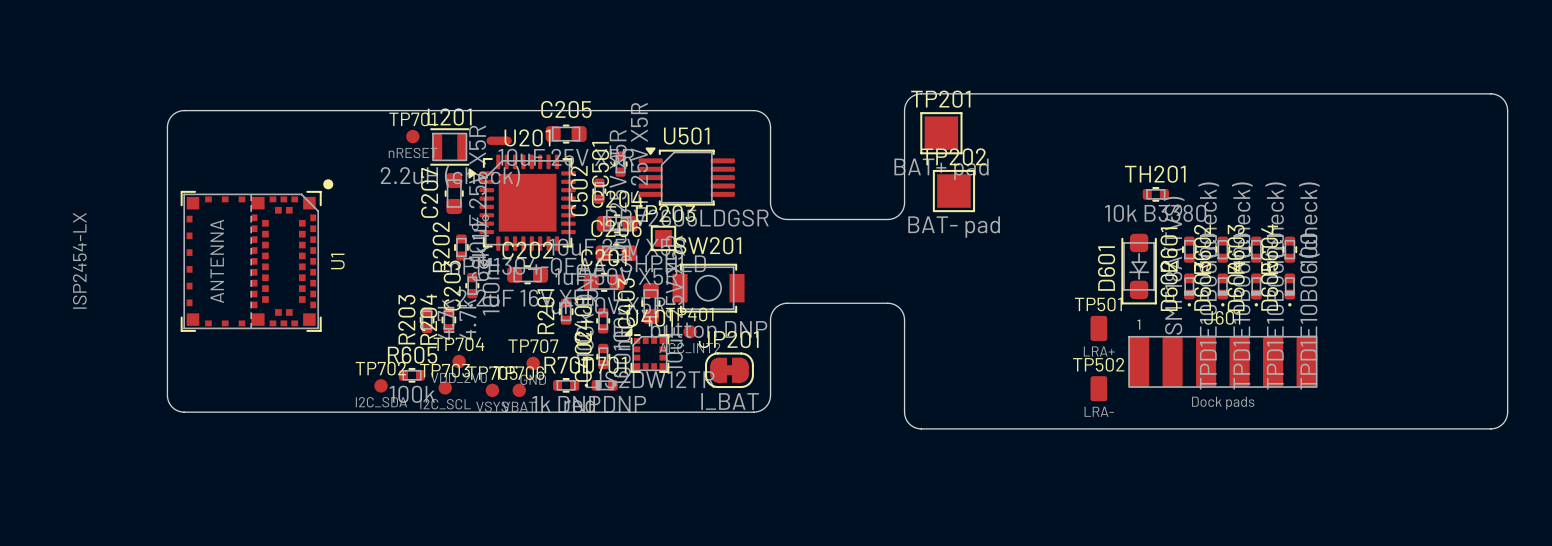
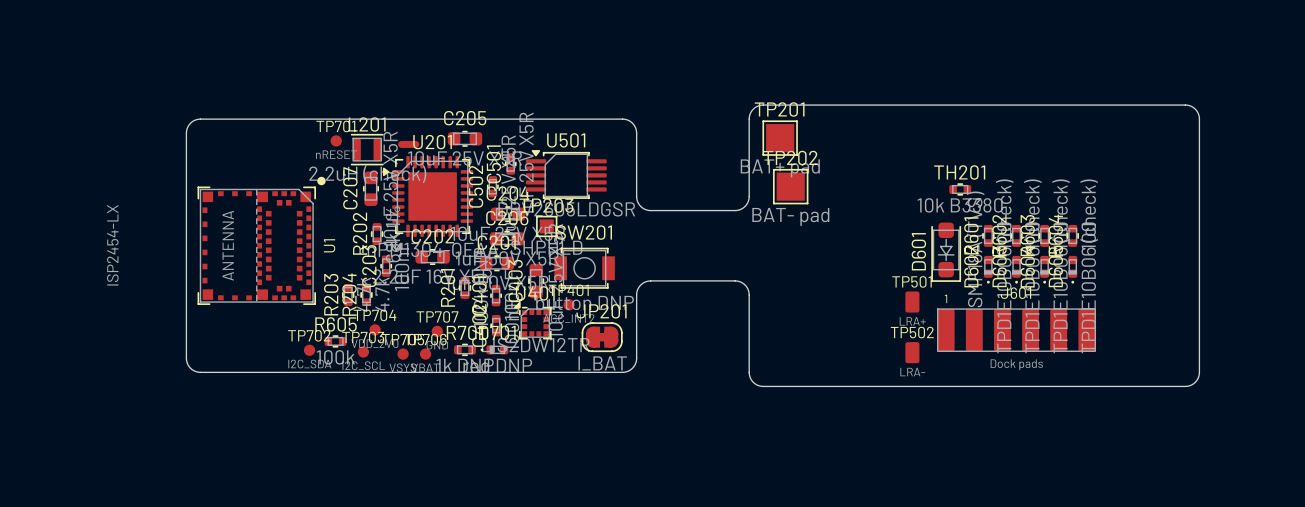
board edge: (1423, 93) (1495, 94) (1504, 100) (1507, 110) (1507, 416) (1502, 424) (1493, 428) (1423, 428) -> (1185, 105) (1195, 109) (1199, 119) (1199, 372) (1195, 382) (1185, 386)
board edge: (251, 110) (180, 111) (171, 116) (167, 127) (168, 399) (172, 407) (181, 412) (251, 412) -> (200, 119) (190, 123) (186, 133) (186, 358) (190, 368) (200, 372)
U1 position: (256, 255) -> (261, 240)

